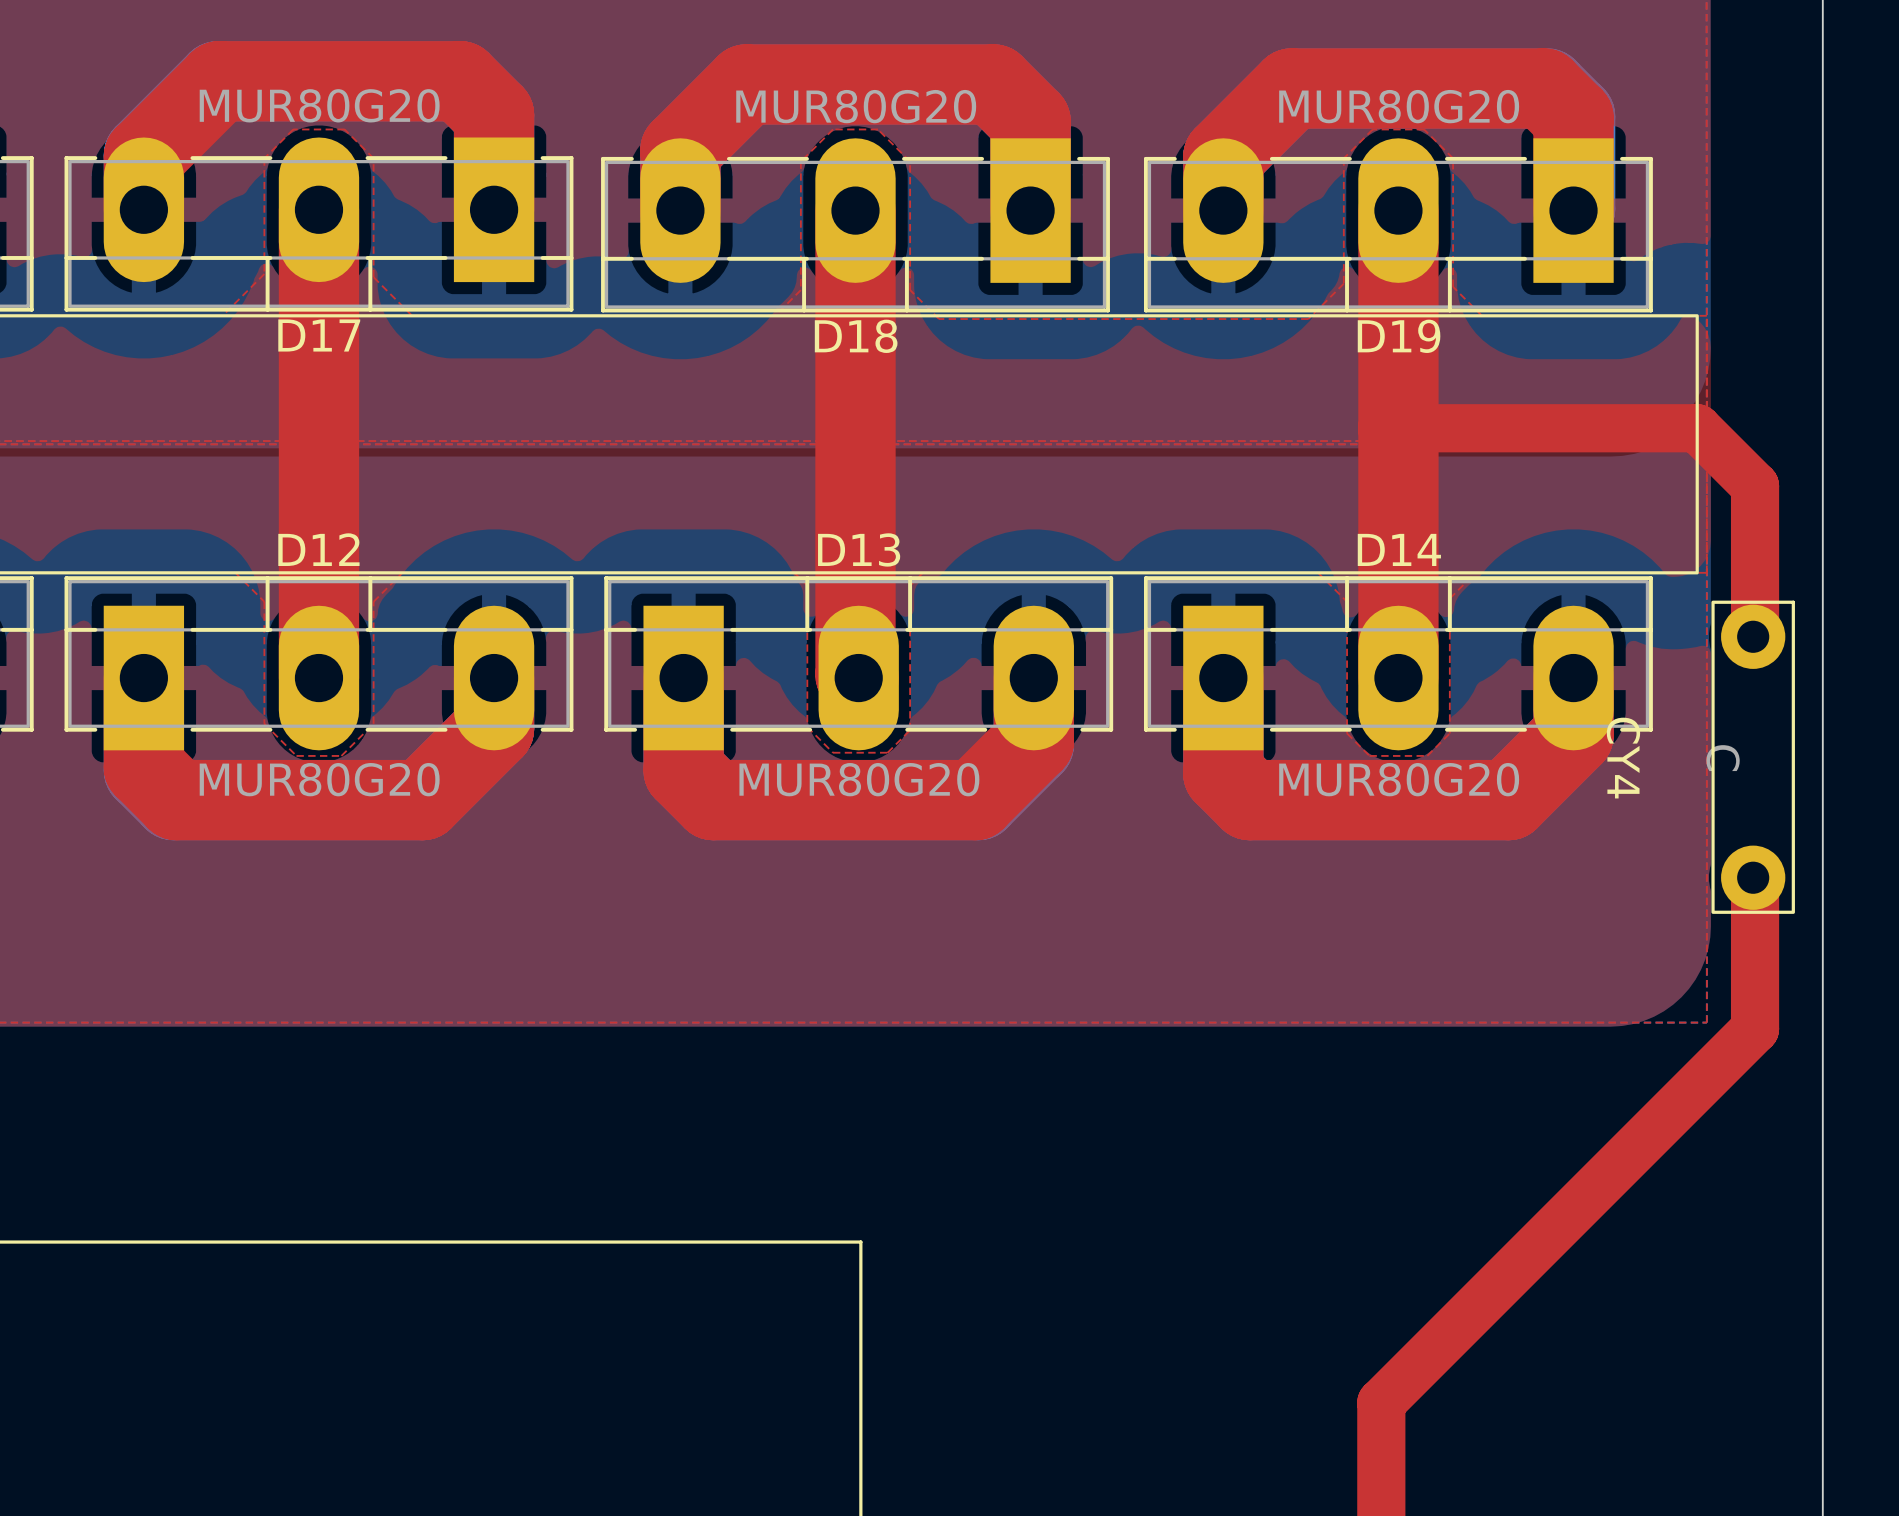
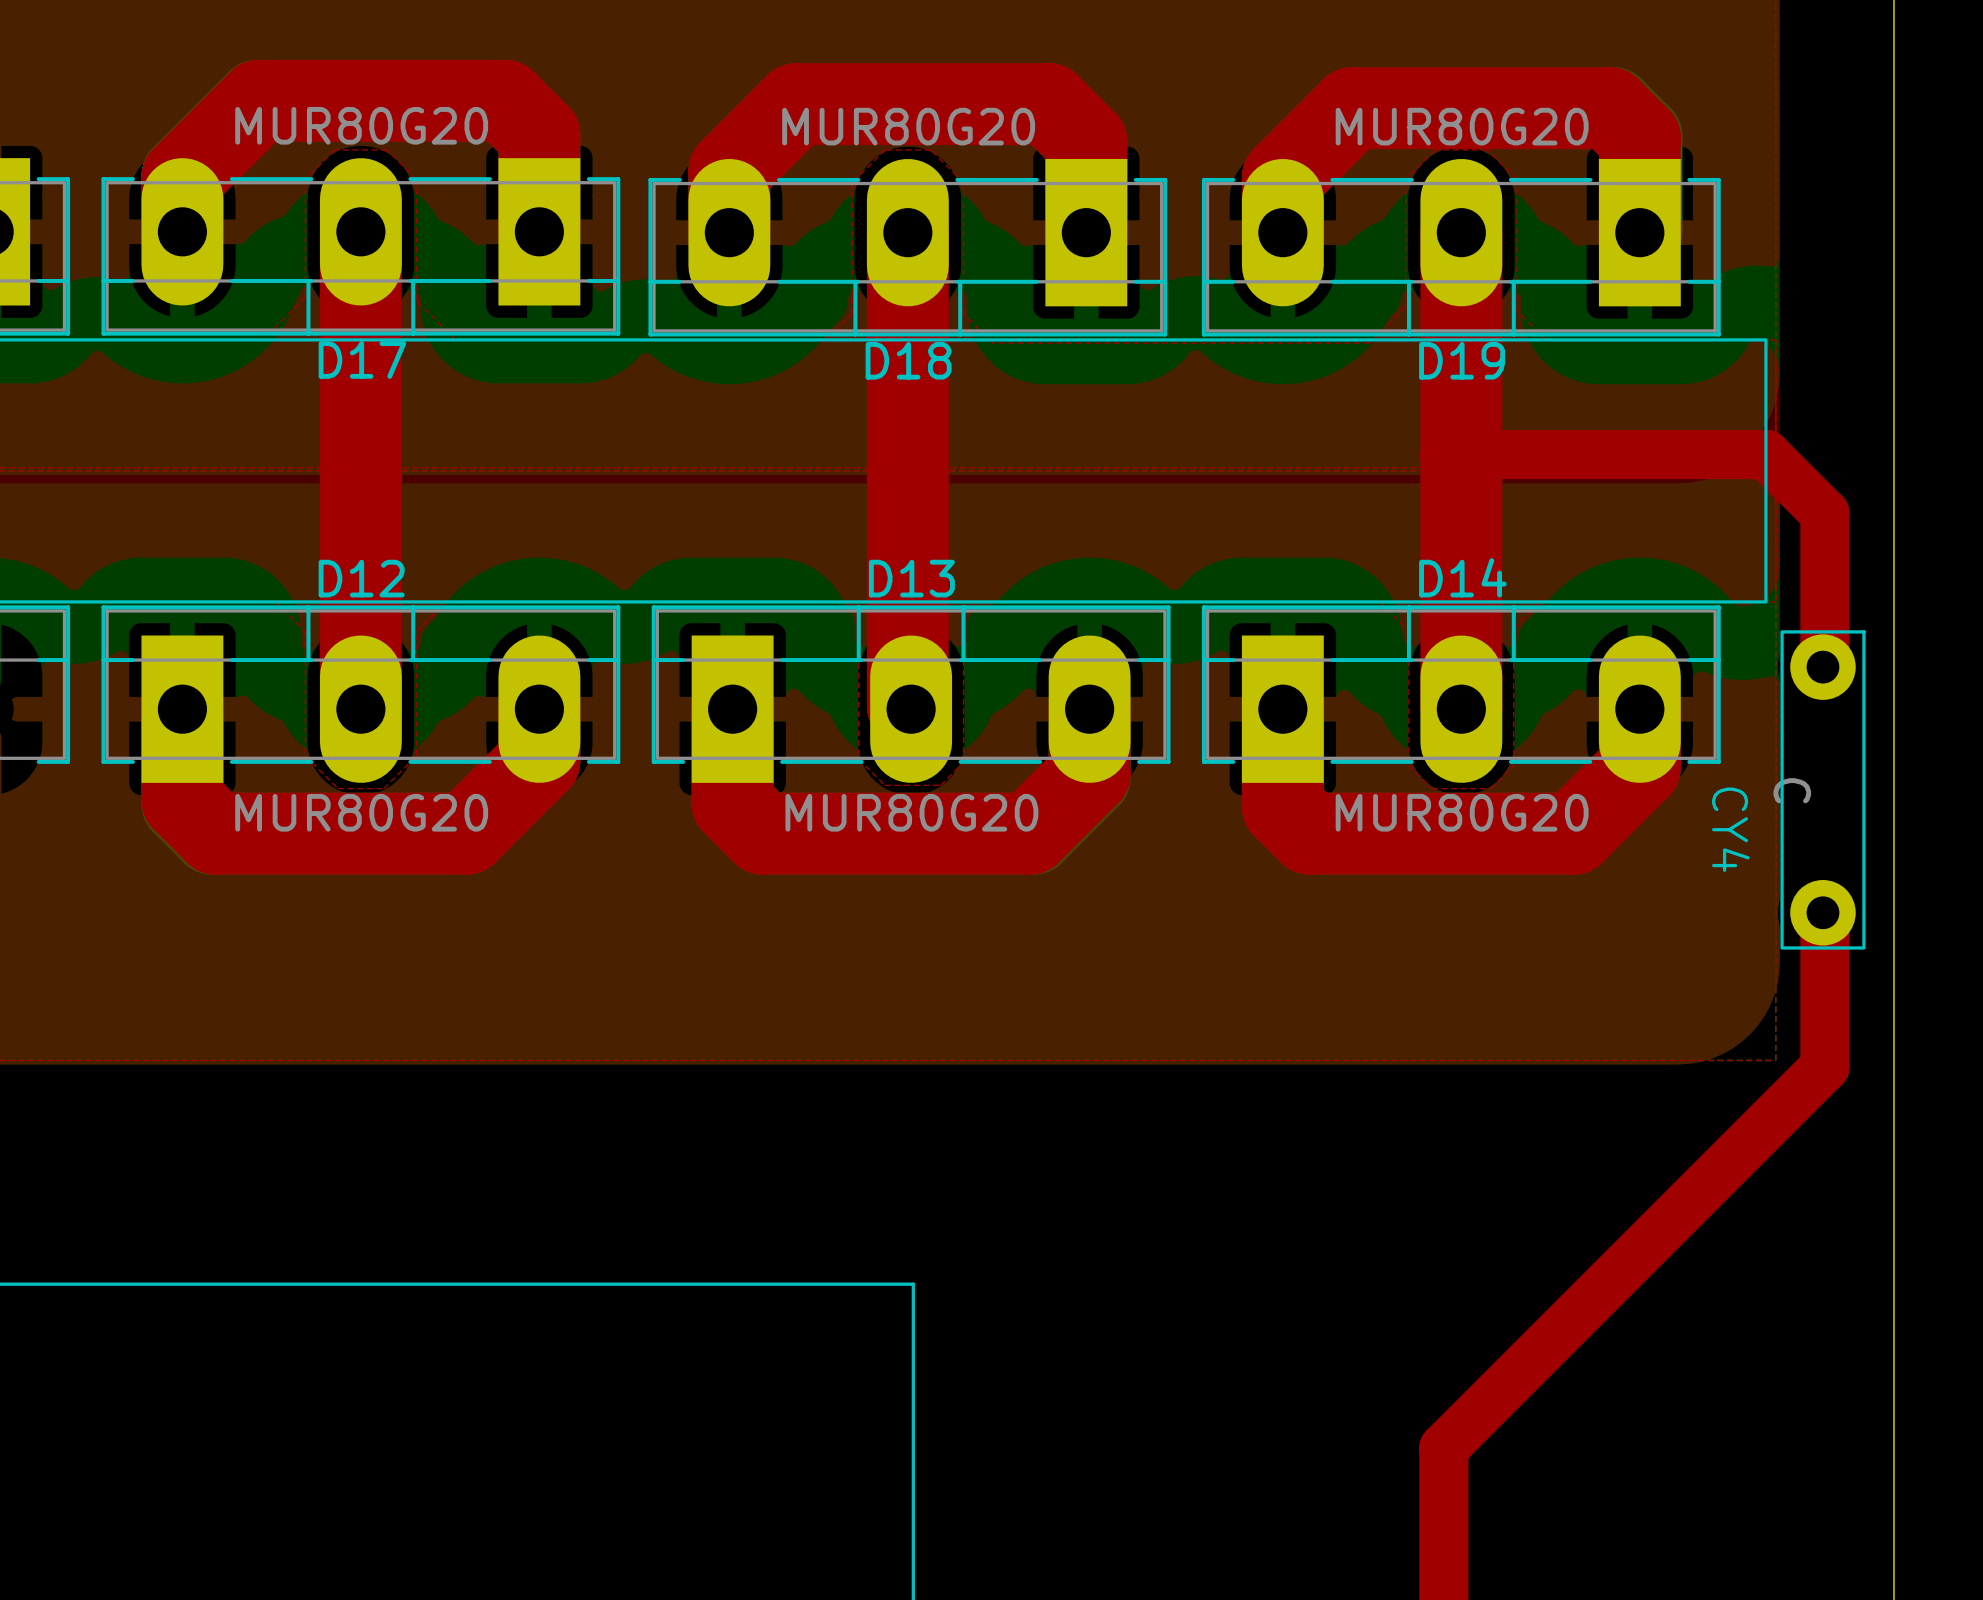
CY4 name position: CY4 (1623, 758) -> CY4 (1730, 829)

